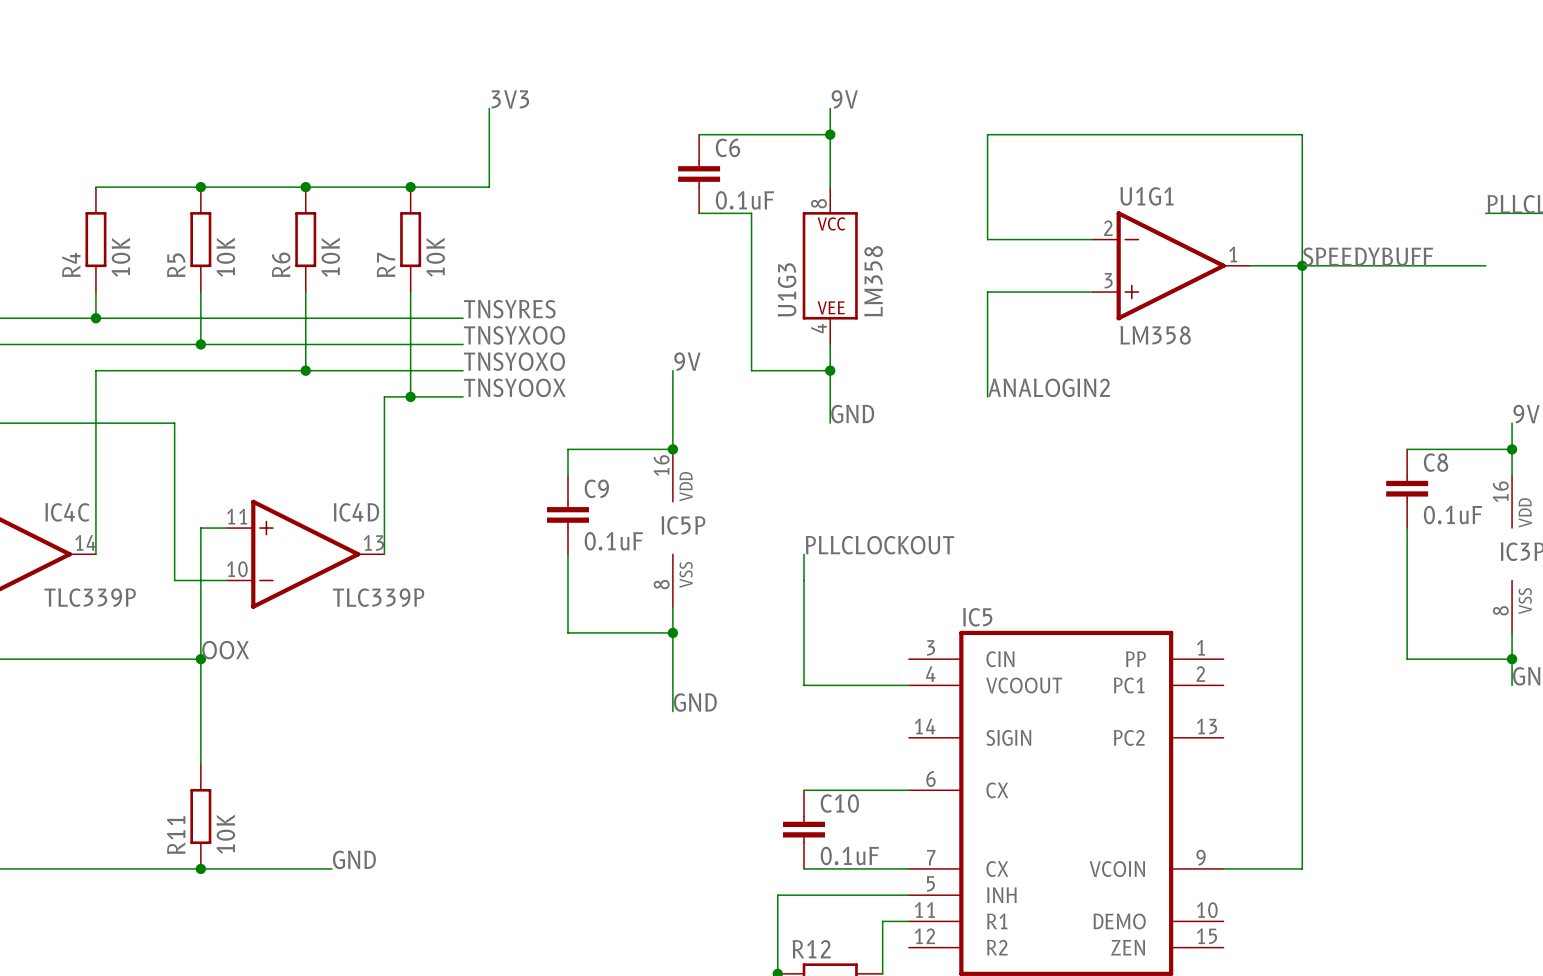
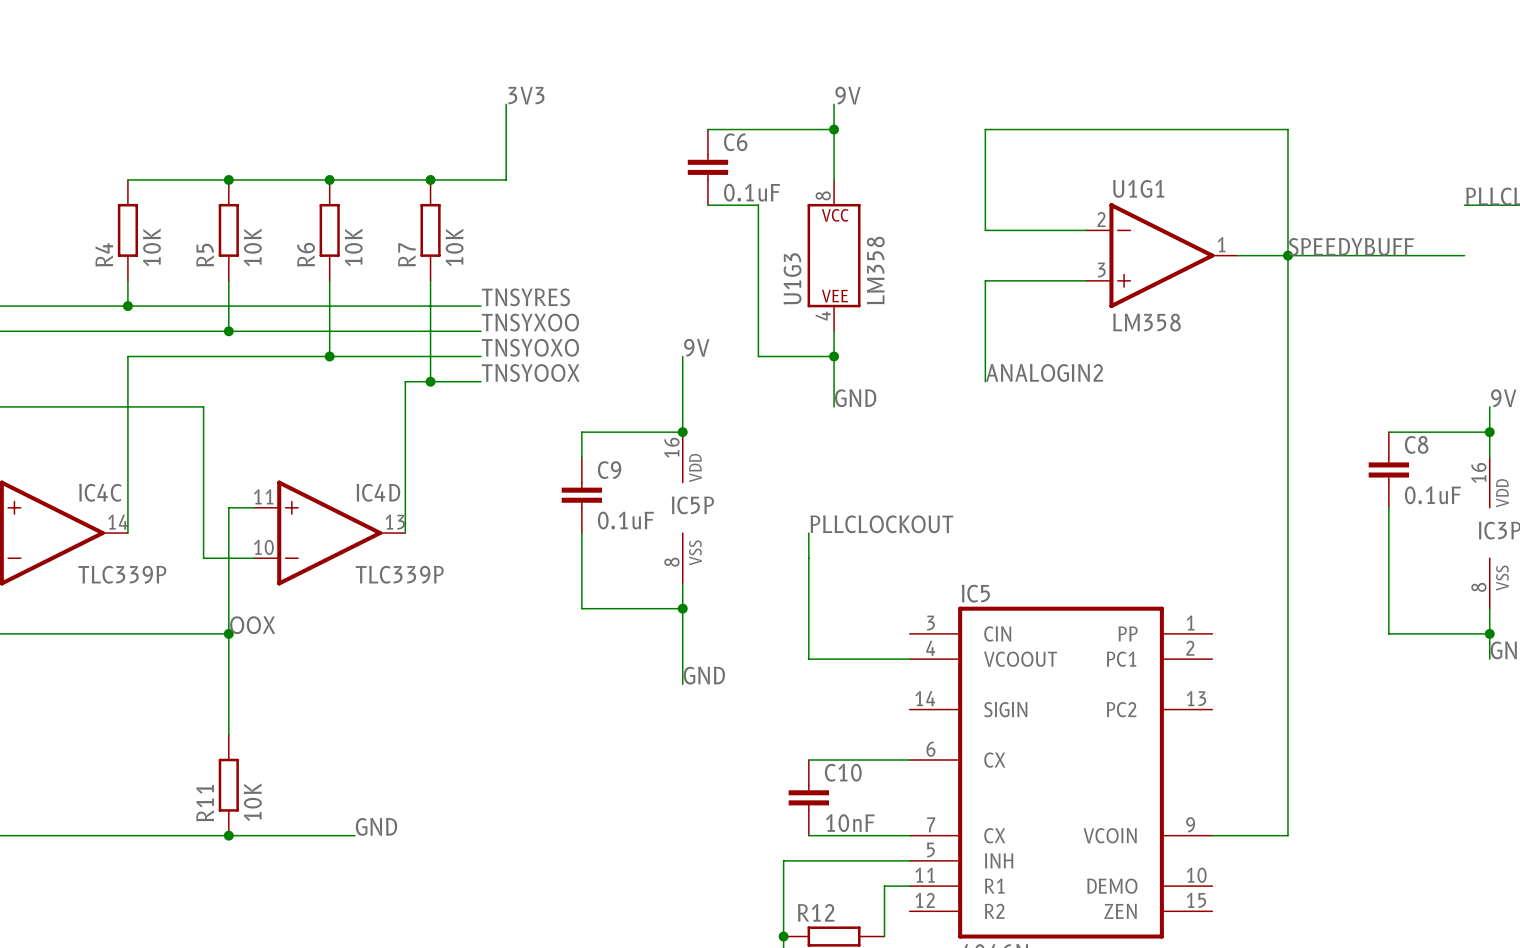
C10 value: 0.1uF (849, 855) -> 10nF (850, 823)

